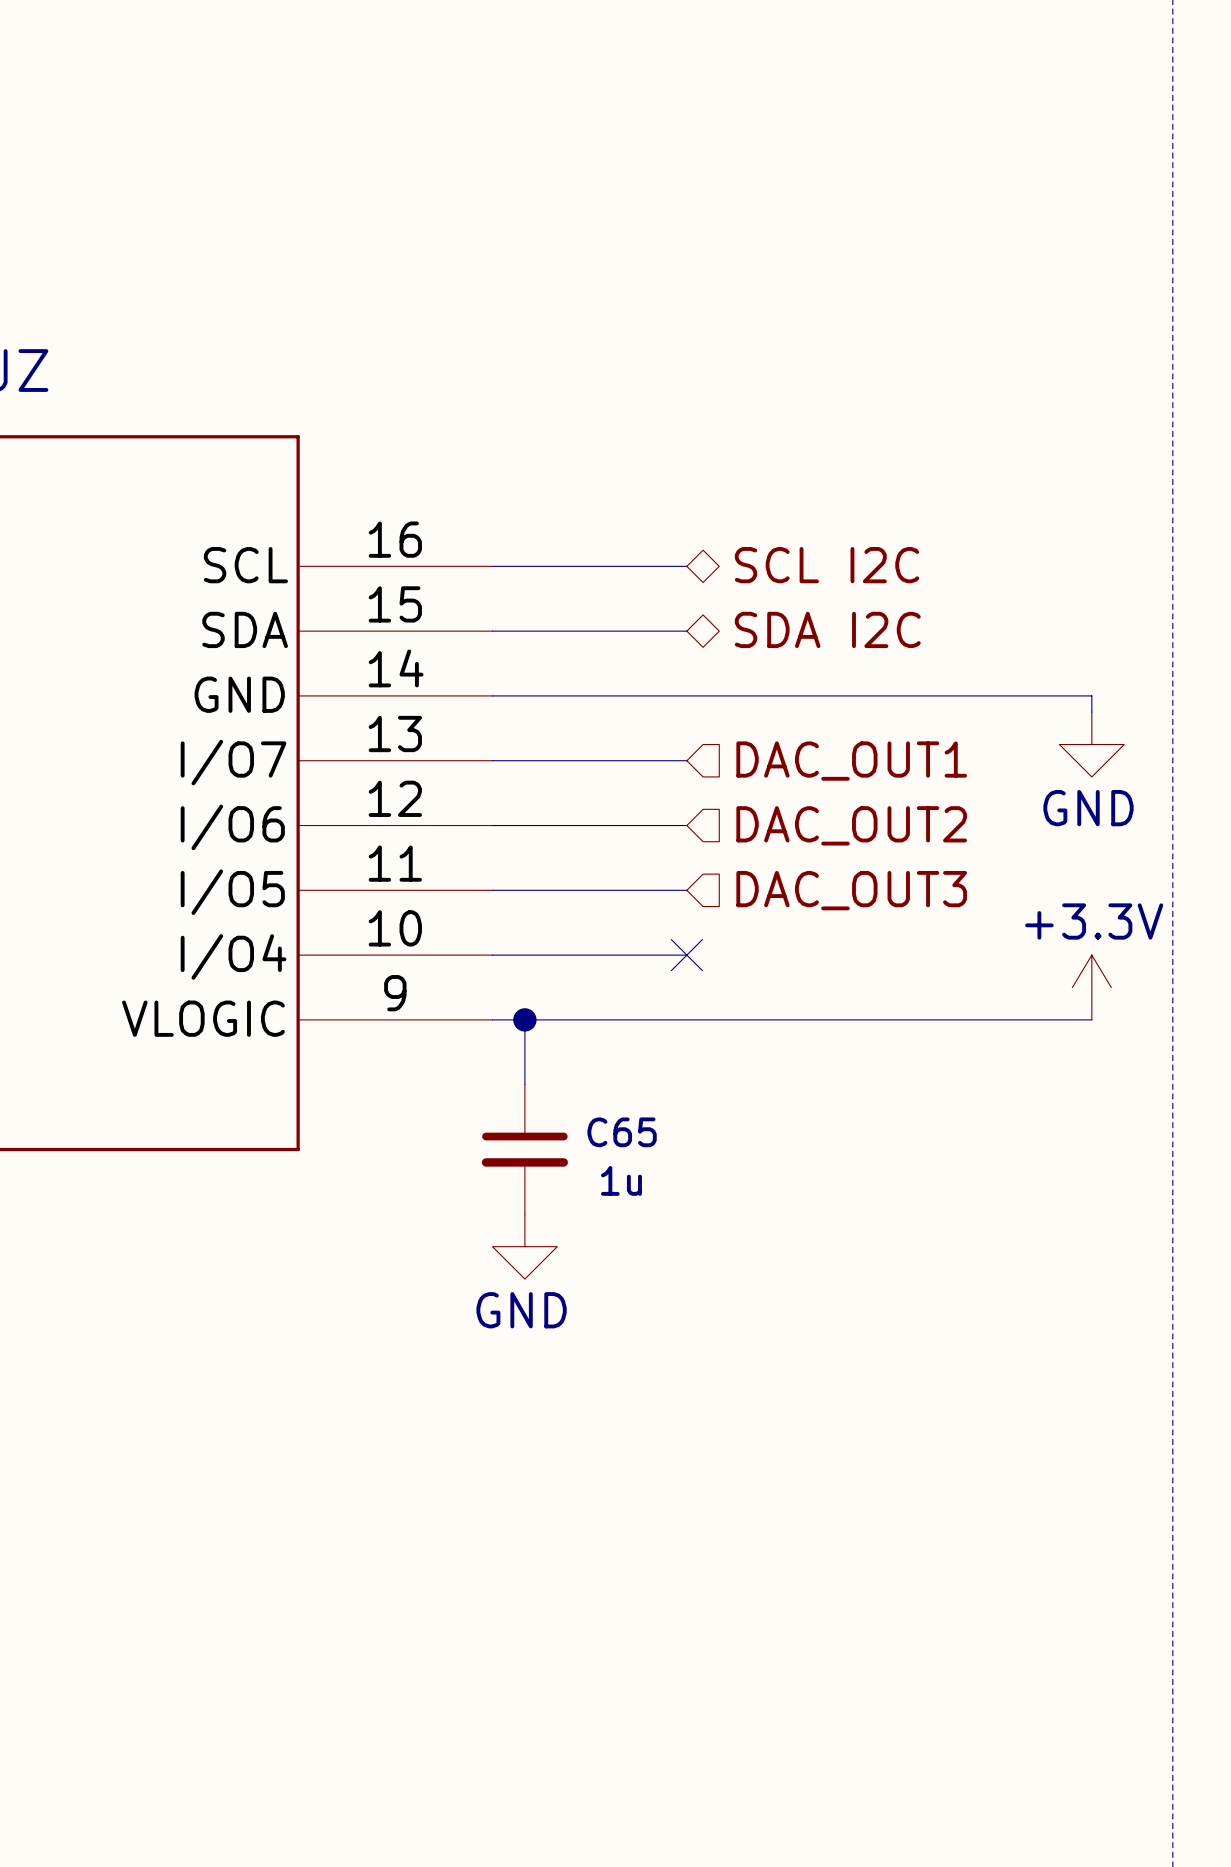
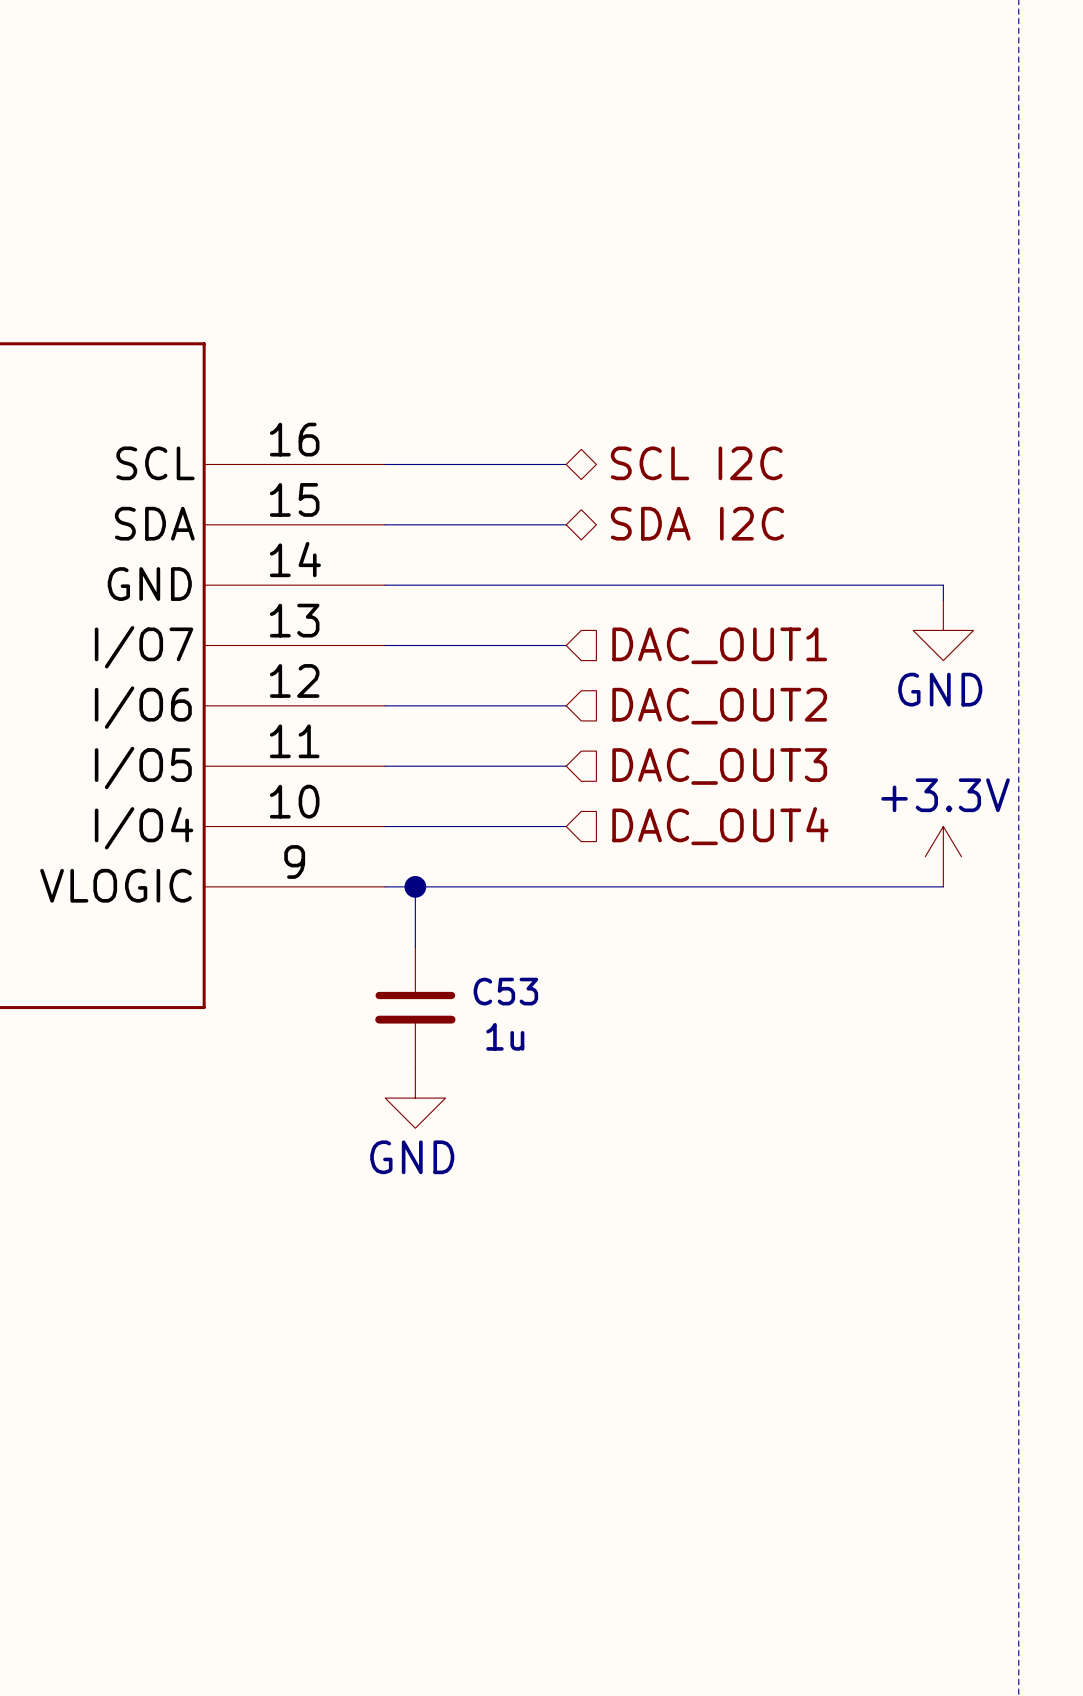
hierarchical label: none -> DAC_OUT4 (720, 826)
no-connect mark: (686, 955) -> none
C65 name: C65 (622, 1132) -> C53 (505, 991)

